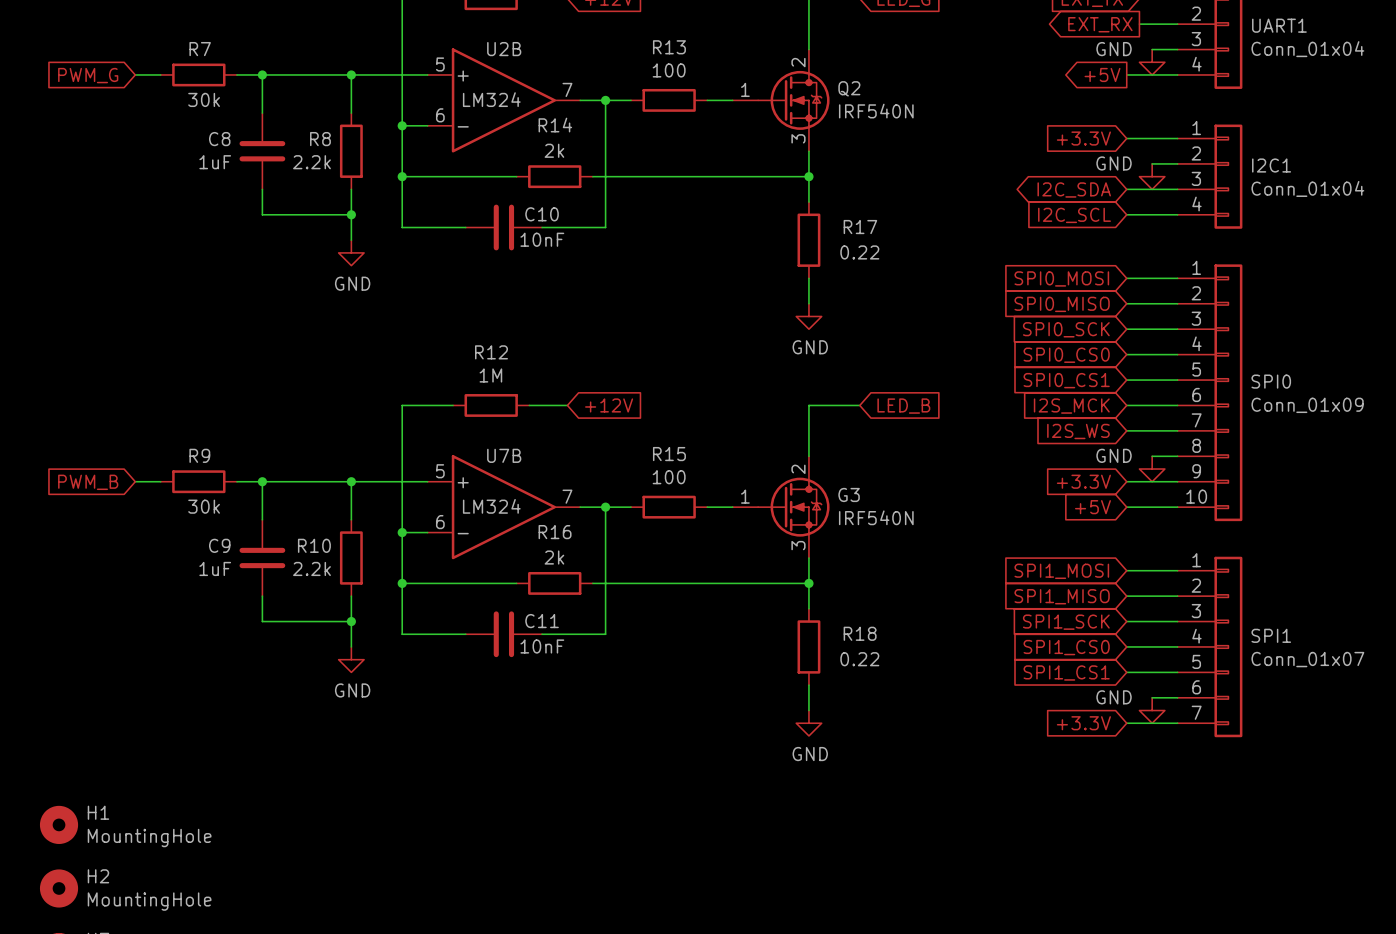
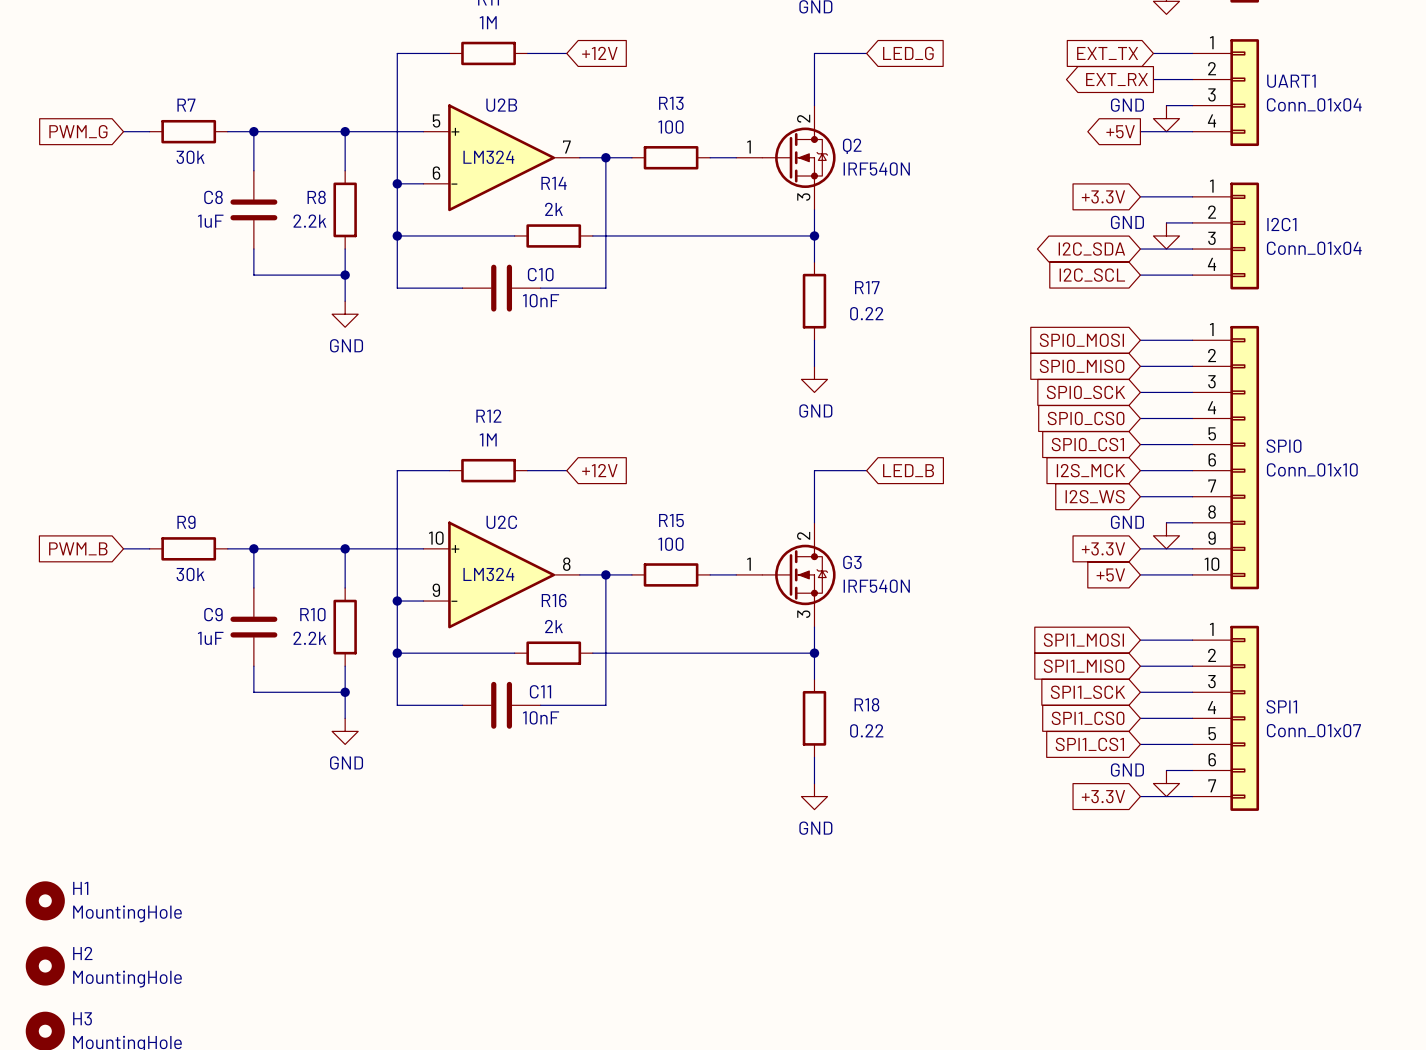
SPI0 value: Conn_01x09 (1307, 405) -> Conn_01x10 (1312, 469)
U7B name: U7B (504, 455) -> U2C (501, 522)
U7B pin number: 5 (440, 471) -> 10 (436, 538)
U7B pin number: 7 (567, 496) -> 8 (566, 564)
U7B pin number: 6 (440, 522) -> 9 (436, 590)

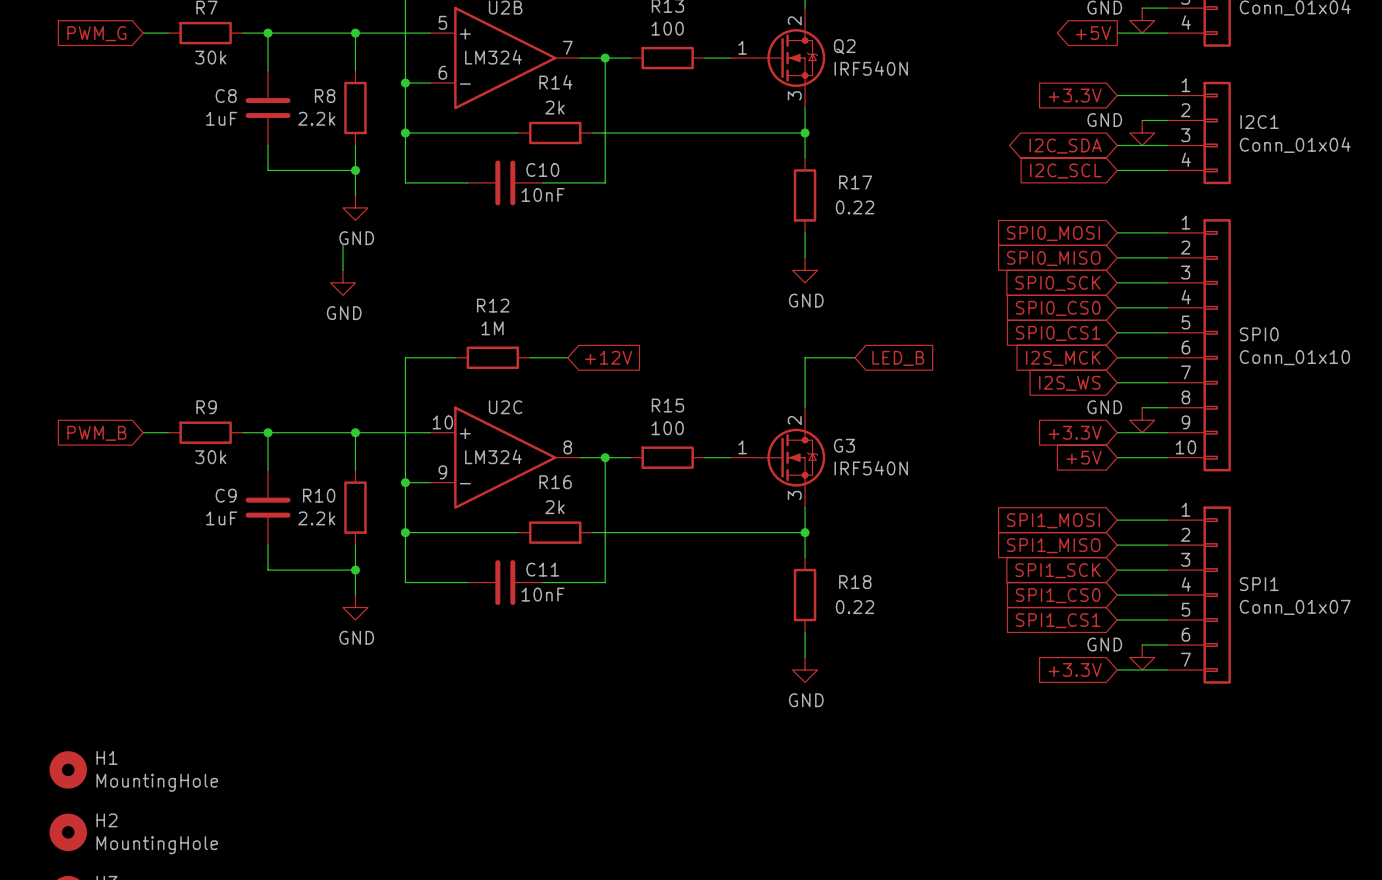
wire: none -> (342, 245) (342, 270)
power symbol: none -> GND (342, 282)

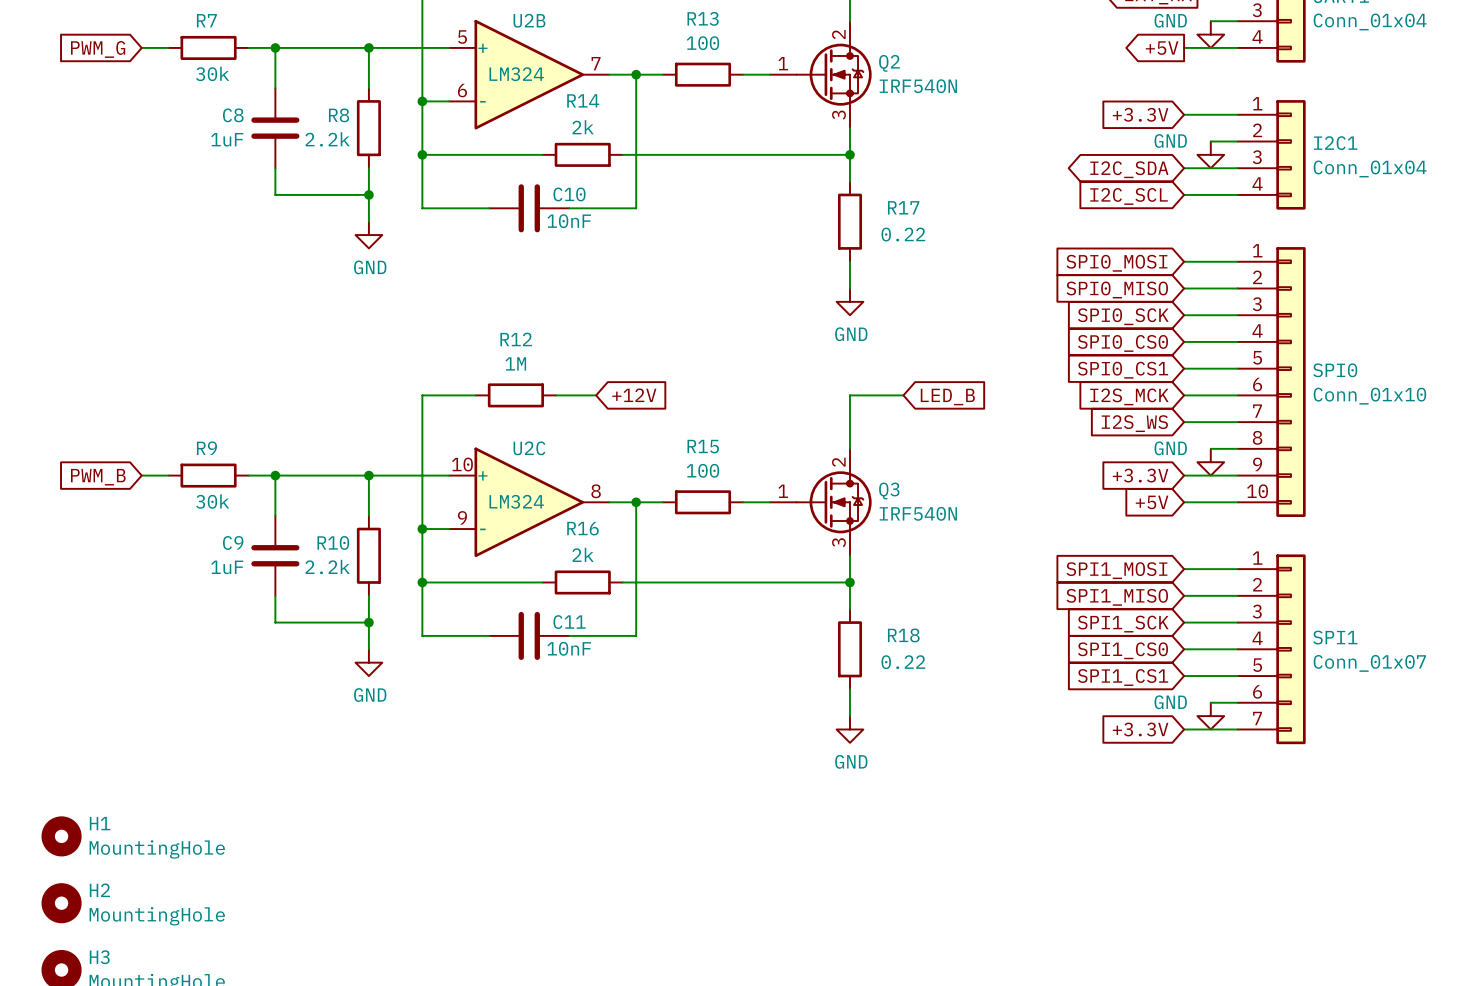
wire: (342, 245) (342, 270) -> none
power symbol: GND (342, 282) -> none
G3 name: G3 (844, 445) -> Q3 (889, 490)

